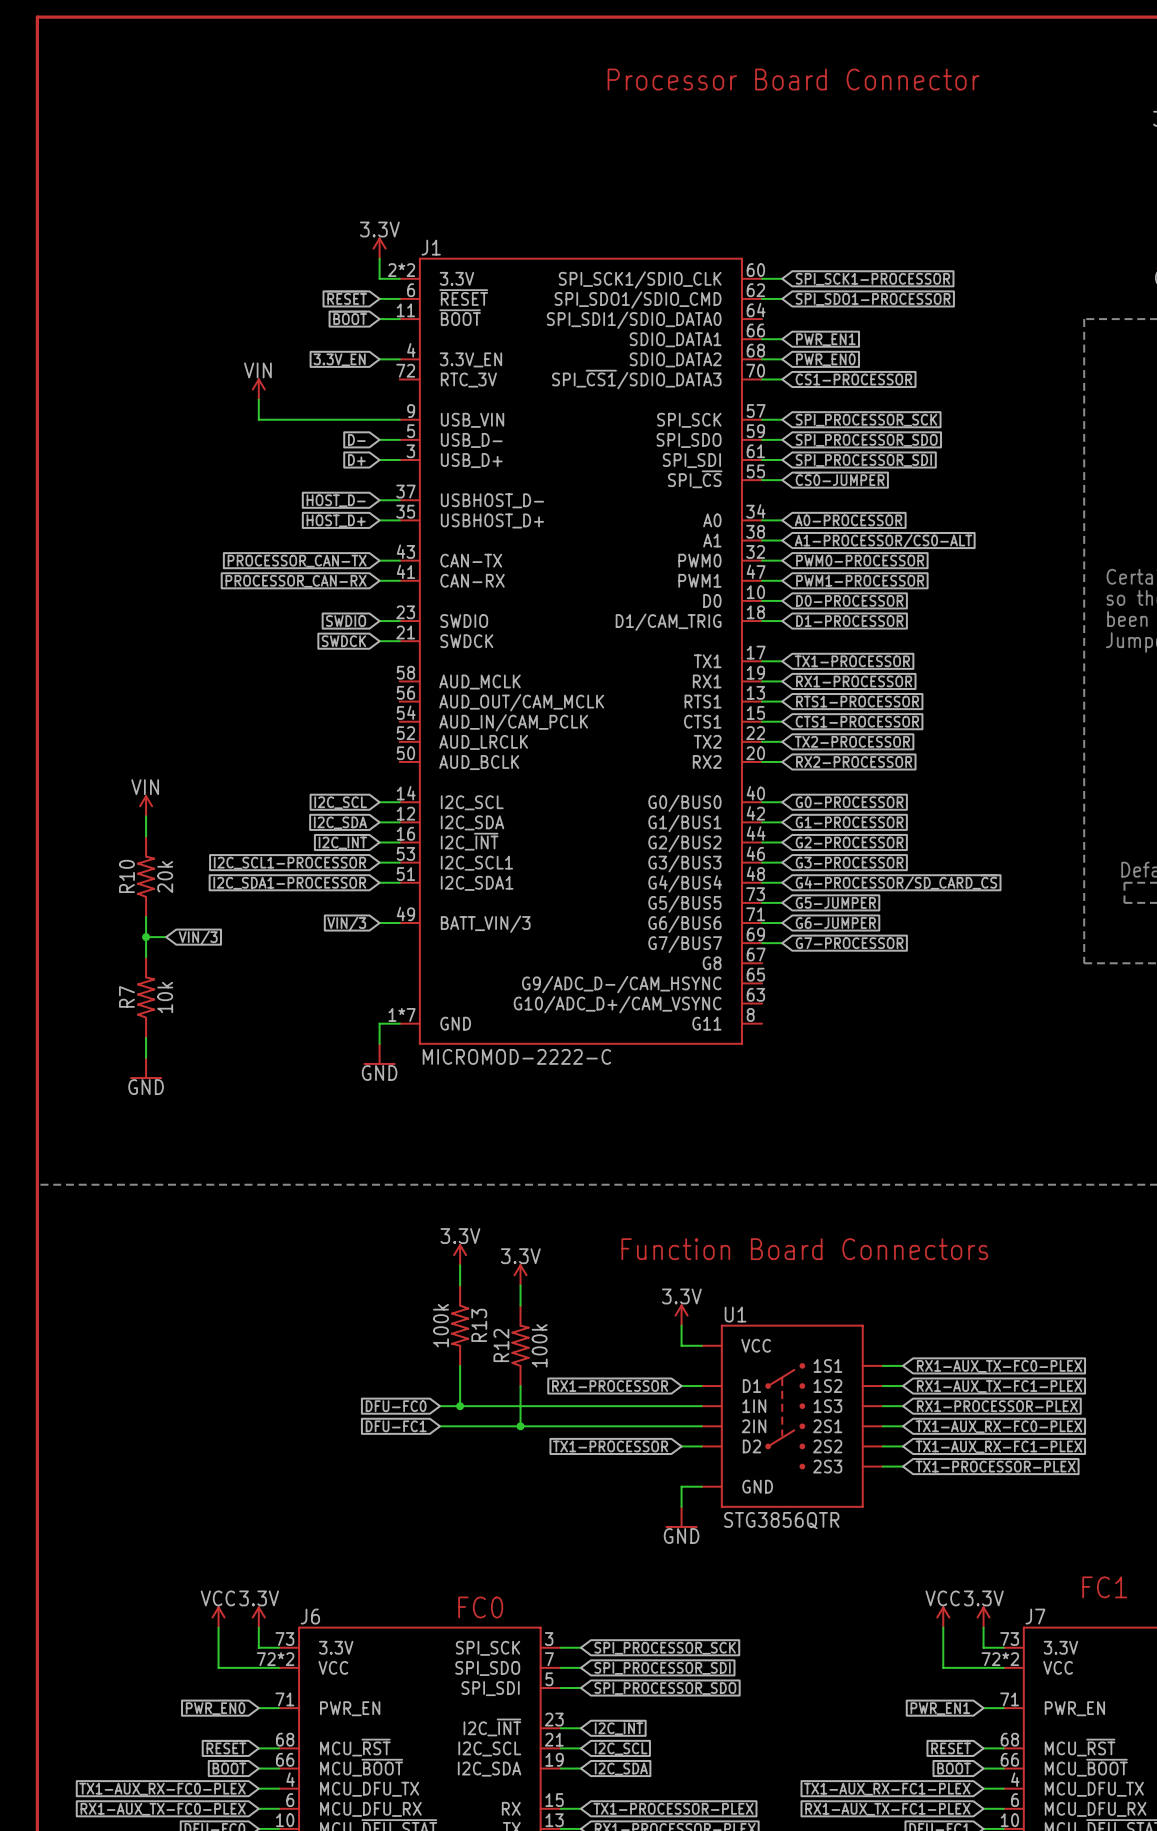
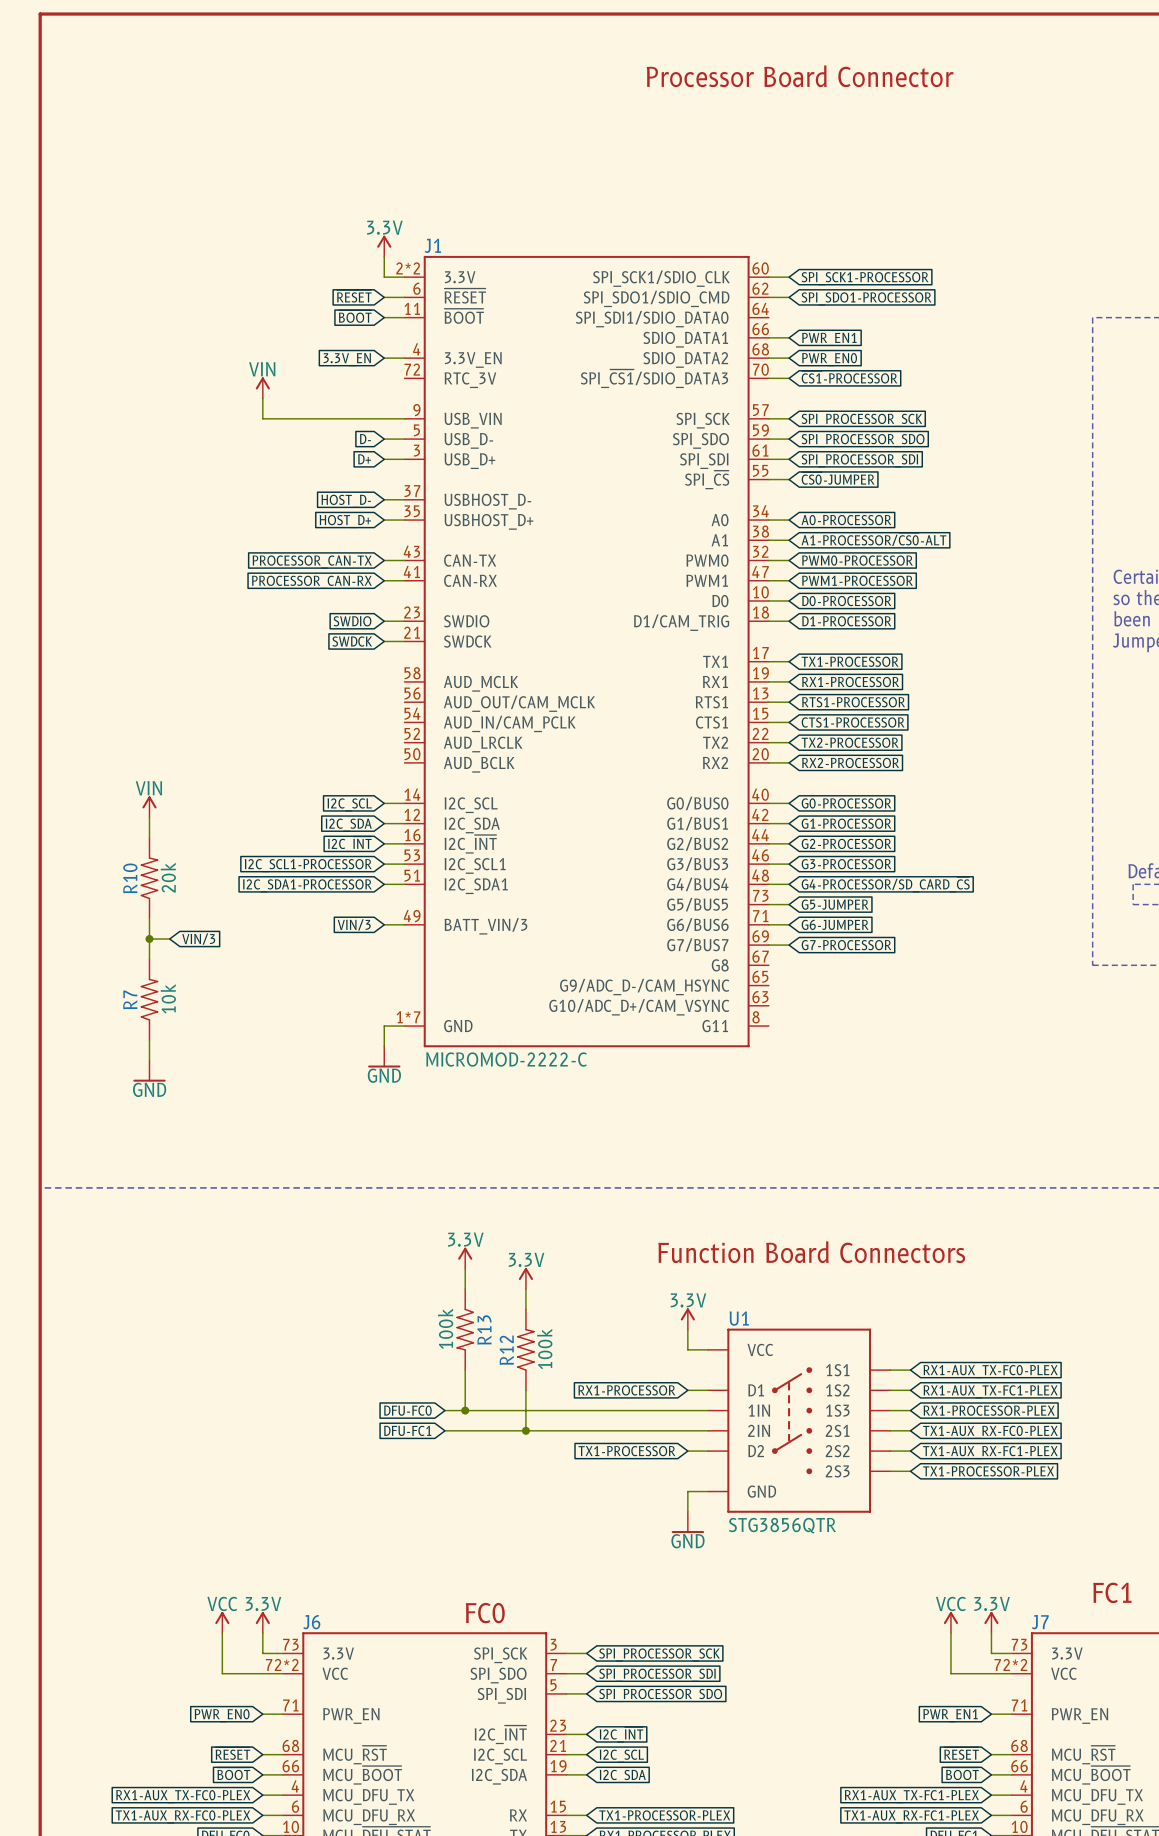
global label: TX1-AUX_RX-FC0-PLEX (162, 1789) -> RX1-AUX_TX-FC0-PLEX (183, 1796)
global label: TX1-AUX_RX-FC1-PLEX (887, 1789) -> RX1-AUX_TX-FC1-PLEX (911, 1796)
global label: RX1-AUX_TX-FC0-PLEX (163, 1809) -> TX1-AUX_RX-FC0-PLEX (183, 1816)
global label: RX1-AUX_TX-FC1-PLEX (887, 1809) -> TX1-AUX_RX-FC1-PLEX (911, 1816)

